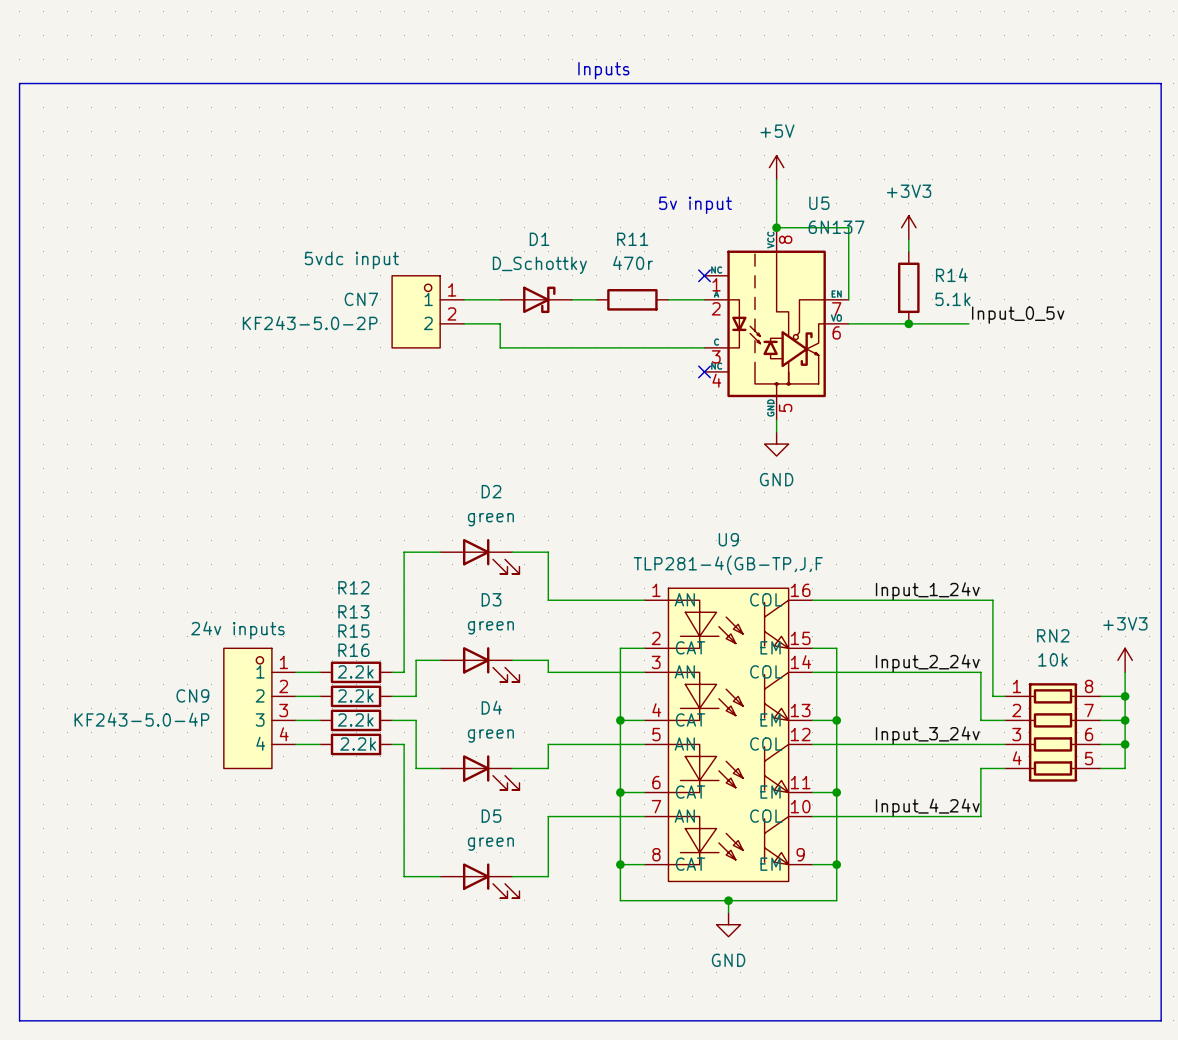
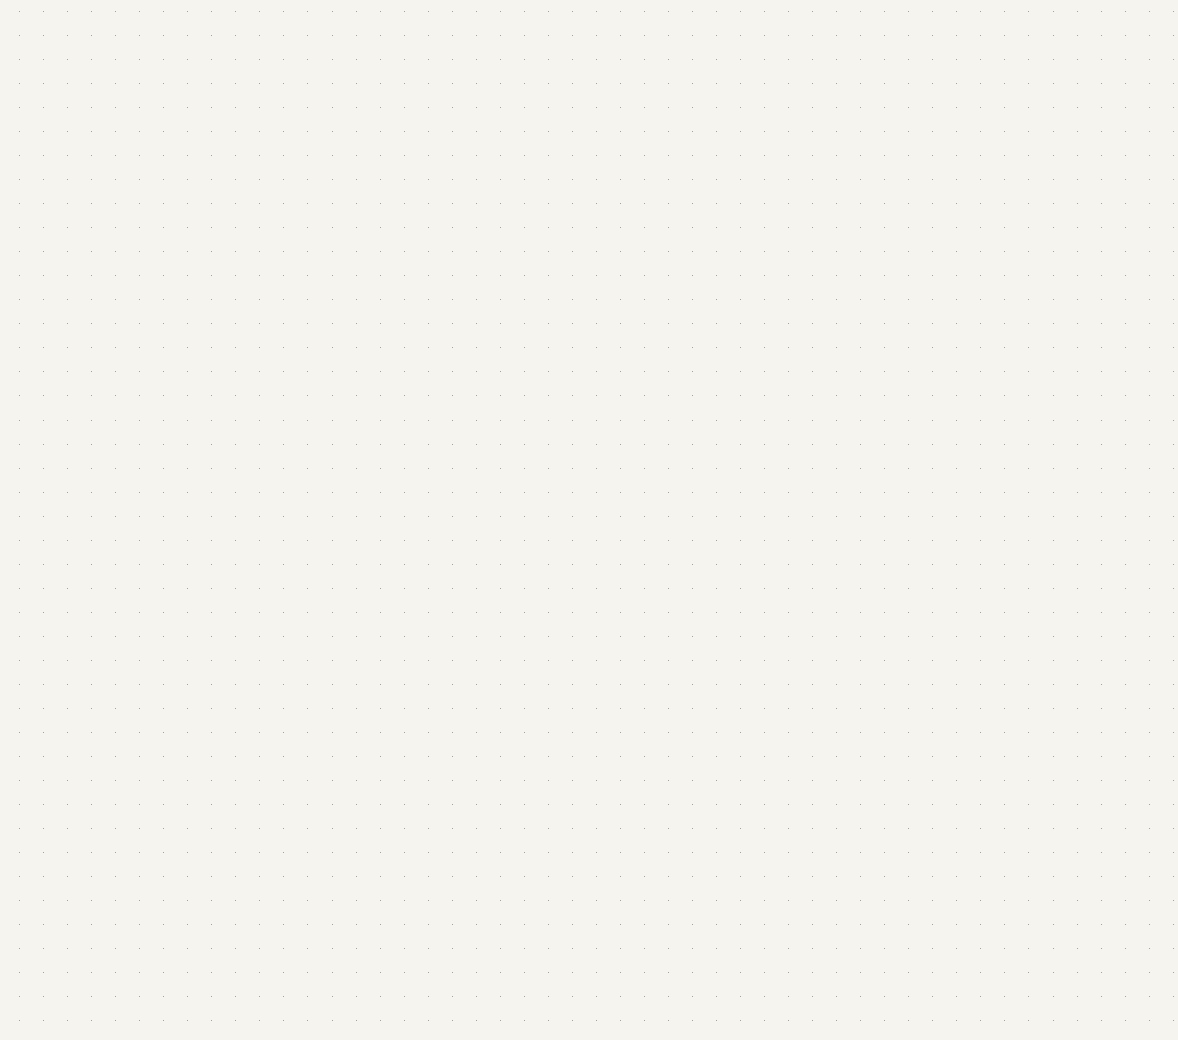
text: Inputs (603, 70) -> none
line: (19, 83) (1161, 83) (1161, 1020) (19, 1020) (19, 83) -> none
power symbol: +5V (776, 167) -> none
wire: (776, 179) (776, 227) (848, 227) (848, 299) -> none
text: 5v input (695, 205) -> none
junction: (776, 227) -> none
power symbol: +3V3 (908, 227) -> none
wire: (908, 239) (908, 251) -> none
no-connect mark: (704, 275) -> none
R14: 5.1k (908, 287) -> none
wire: (464, 299) (500, 299) -> none
D1: D_Schottky (536, 299) -> none
wire: (572, 299) (596, 299) -> none
R11: 470r (632, 299) -> none
wire: (668, 299) (704, 299) -> none
CN7: KF243-5.0-2P (428, 311) -> none
label: Input_0_5v (1018, 315) -> none
wire: (464, 323) (500, 323) (500, 347) (704, 347) -> none
U5: 6N137 (776, 323) -> none
wire: (848, 323) (968, 323) -> none
junction: (908, 323) -> none
no-connect mark: (704, 371) -> none
wire: (776, 420) (776, 432) -> none
power symbol: GND (776, 444) -> none
wire: (440, 552) (404, 552) (404, 672) (392, 672) -> none
wire: (512, 552) (548, 552) (548, 600) (644, 600) -> none
D2: green (479, 556) -> none
label: Input_1_24v (927, 591) -> none
wire: (812, 600) (992, 600) (992, 696) (1004, 696) -> none
wire: (644, 648) (620, 648) (620, 900) (836, 900) (836, 648) (812, 648) -> none
wire: (440, 660) (416, 660) (416, 696) (392, 696) -> none
wire: (512, 660) (548, 660) (548, 672) (644, 672) -> none
power symbol: +3V3 (1125, 660) -> none
label: Input_2_24v (927, 663) -> none
D3: green (479, 664) -> none
wire: (295, 672) (319, 672) -> none
R12: 2.2k (356, 672) -> none
wire: (812, 672) (980, 672) (980, 720) (1004, 720) -> none
wire: (1125, 672) (1125, 768) (1101, 768) -> none
wire: (295, 696) (319, 696) -> none
R13: 2.2k (356, 696) -> none
wire: (1101, 696) (1125, 696) -> none
junction: (1125, 696) -> none
CN9: KF243-5.0-4P (259, 708) -> none
wire: (295, 720) (319, 720) -> none
R15: 2.2k (356, 720) -> none
wire: (392, 720) (416, 720) (416, 768) (440, 768) -> none
wire: (620, 720) (644, 720) -> none
junction: (620, 720) -> none
wire: (812, 720) (836, 720) -> none
junction: (836, 720) -> none
wire: (1101, 720) (1125, 720) -> none
junction: (1125, 720) -> none
RN2: 10k (1053, 732) -> none
U9: TLP281-4(GB-TP,J,F (728, 734) -> none
label: Input_3_24v (927, 735) -> none
wire: (295, 744) (319, 744) -> none
R16: 2.2k (356, 744) -> none
wire: (392, 744) (404, 744) (404, 876) (440, 876) -> none
wire: (644, 744) (548, 744) (548, 768) (512, 768) -> none
wire: (812, 744) (1004, 744) -> none
wire: (1101, 744) (1125, 744) -> none
junction: (1125, 744) -> none
wire: (1004, 768) (980, 768) (980, 816) (812, 816) -> none
D4: green (479, 772) -> none
wire: (620, 792) (644, 792) -> none
junction: (620, 792) -> none
wire: (812, 792) (836, 792) -> none
junction: (836, 792) -> none
label: Input_4_24v (927, 807) -> none
wire: (644, 816) (548, 816) (548, 876) (512, 876) -> none
wire: (620, 864) (644, 864) -> none
junction: (620, 864) -> none
wire: (812, 864) (836, 864) -> none
junction: (836, 864) -> none
D5: green (479, 880) -> none
wire: (728, 900) (728, 912) -> none
junction: (728, 900) -> none
power symbol: GND (728, 924) -> none

